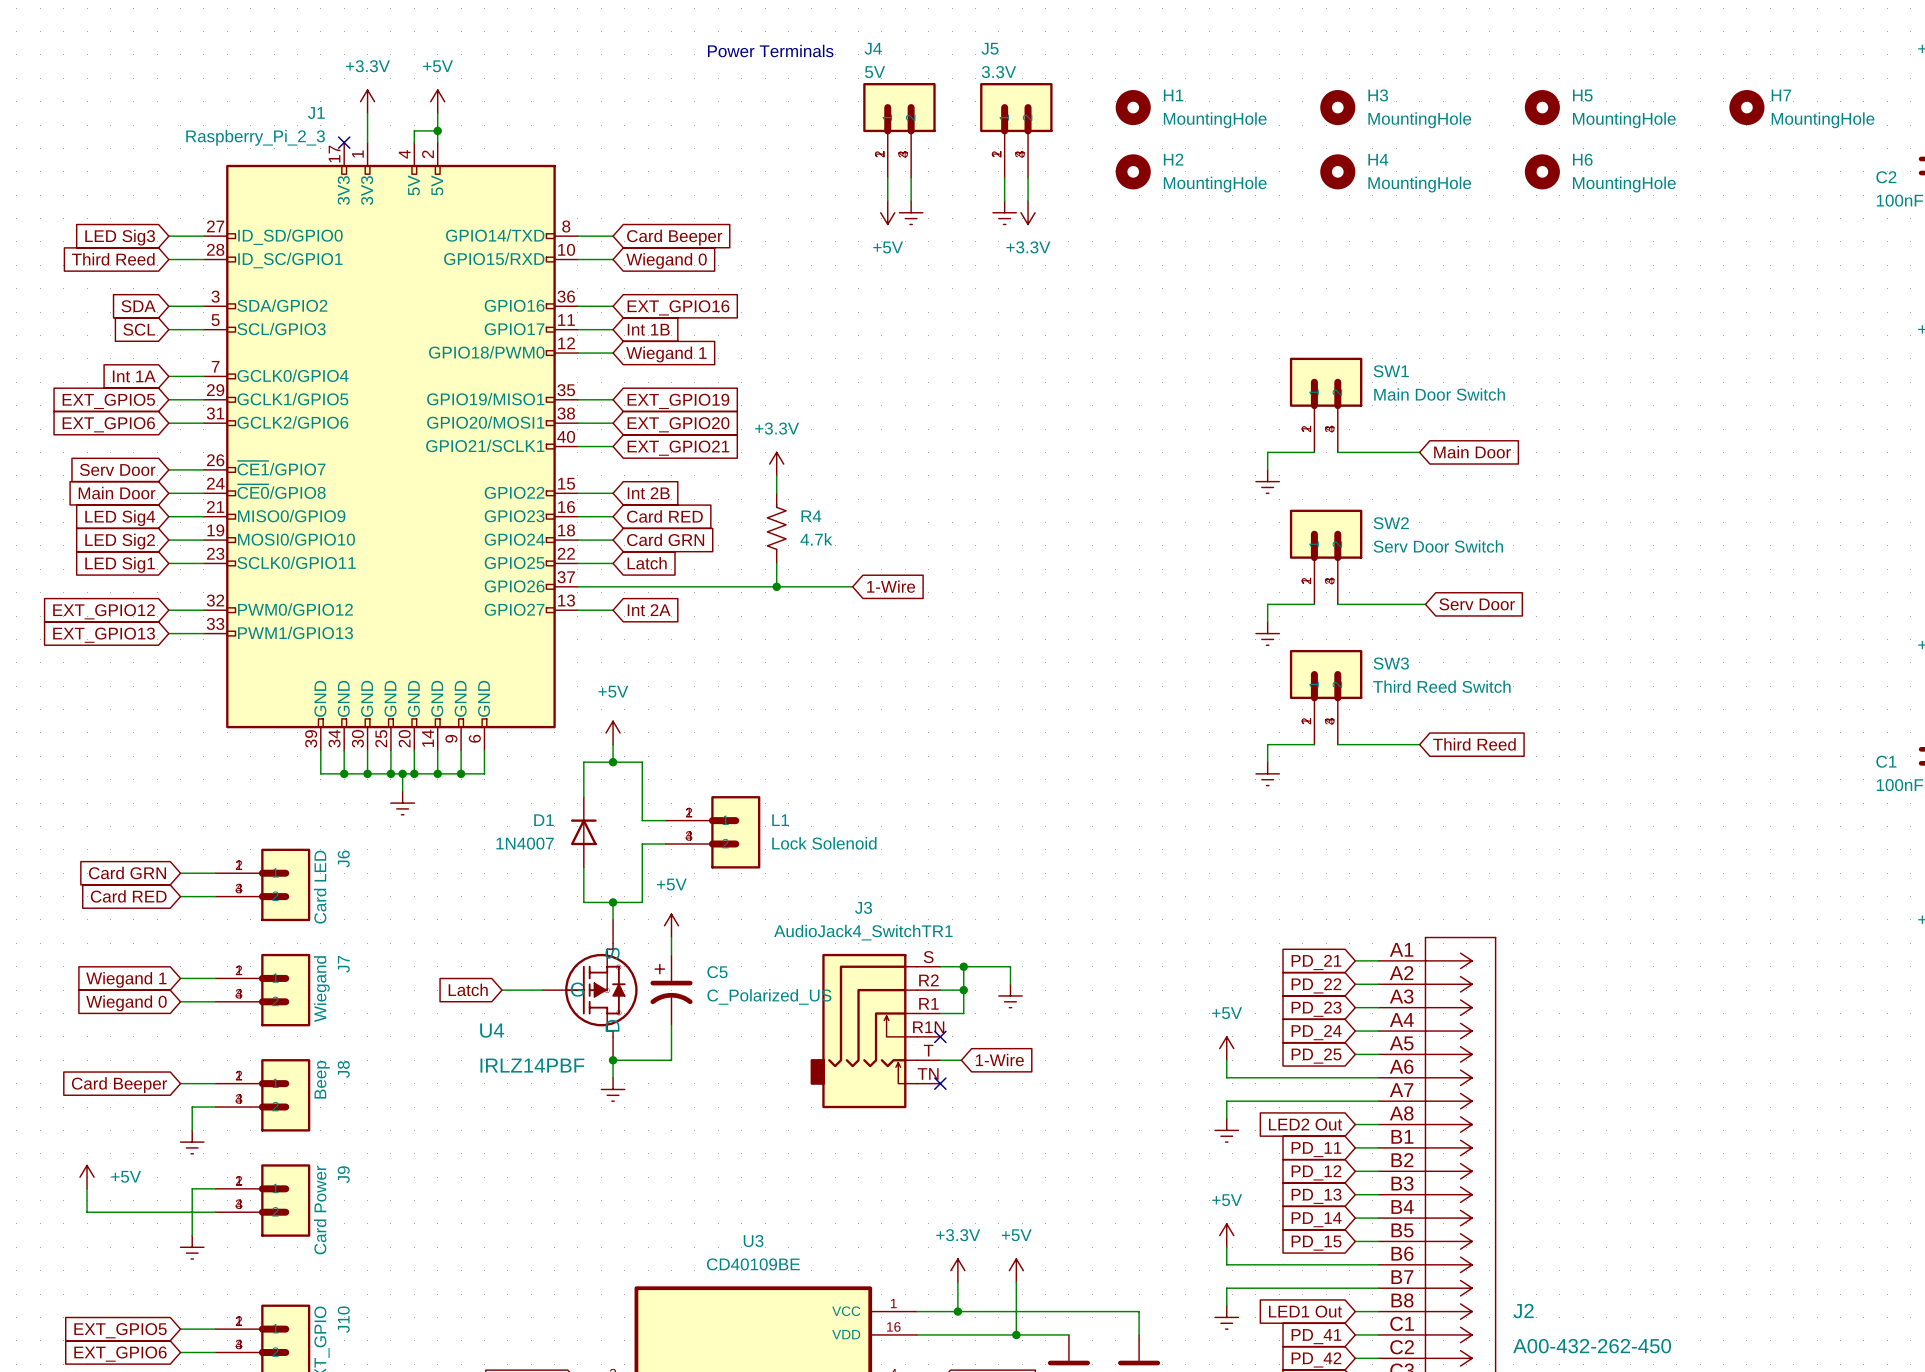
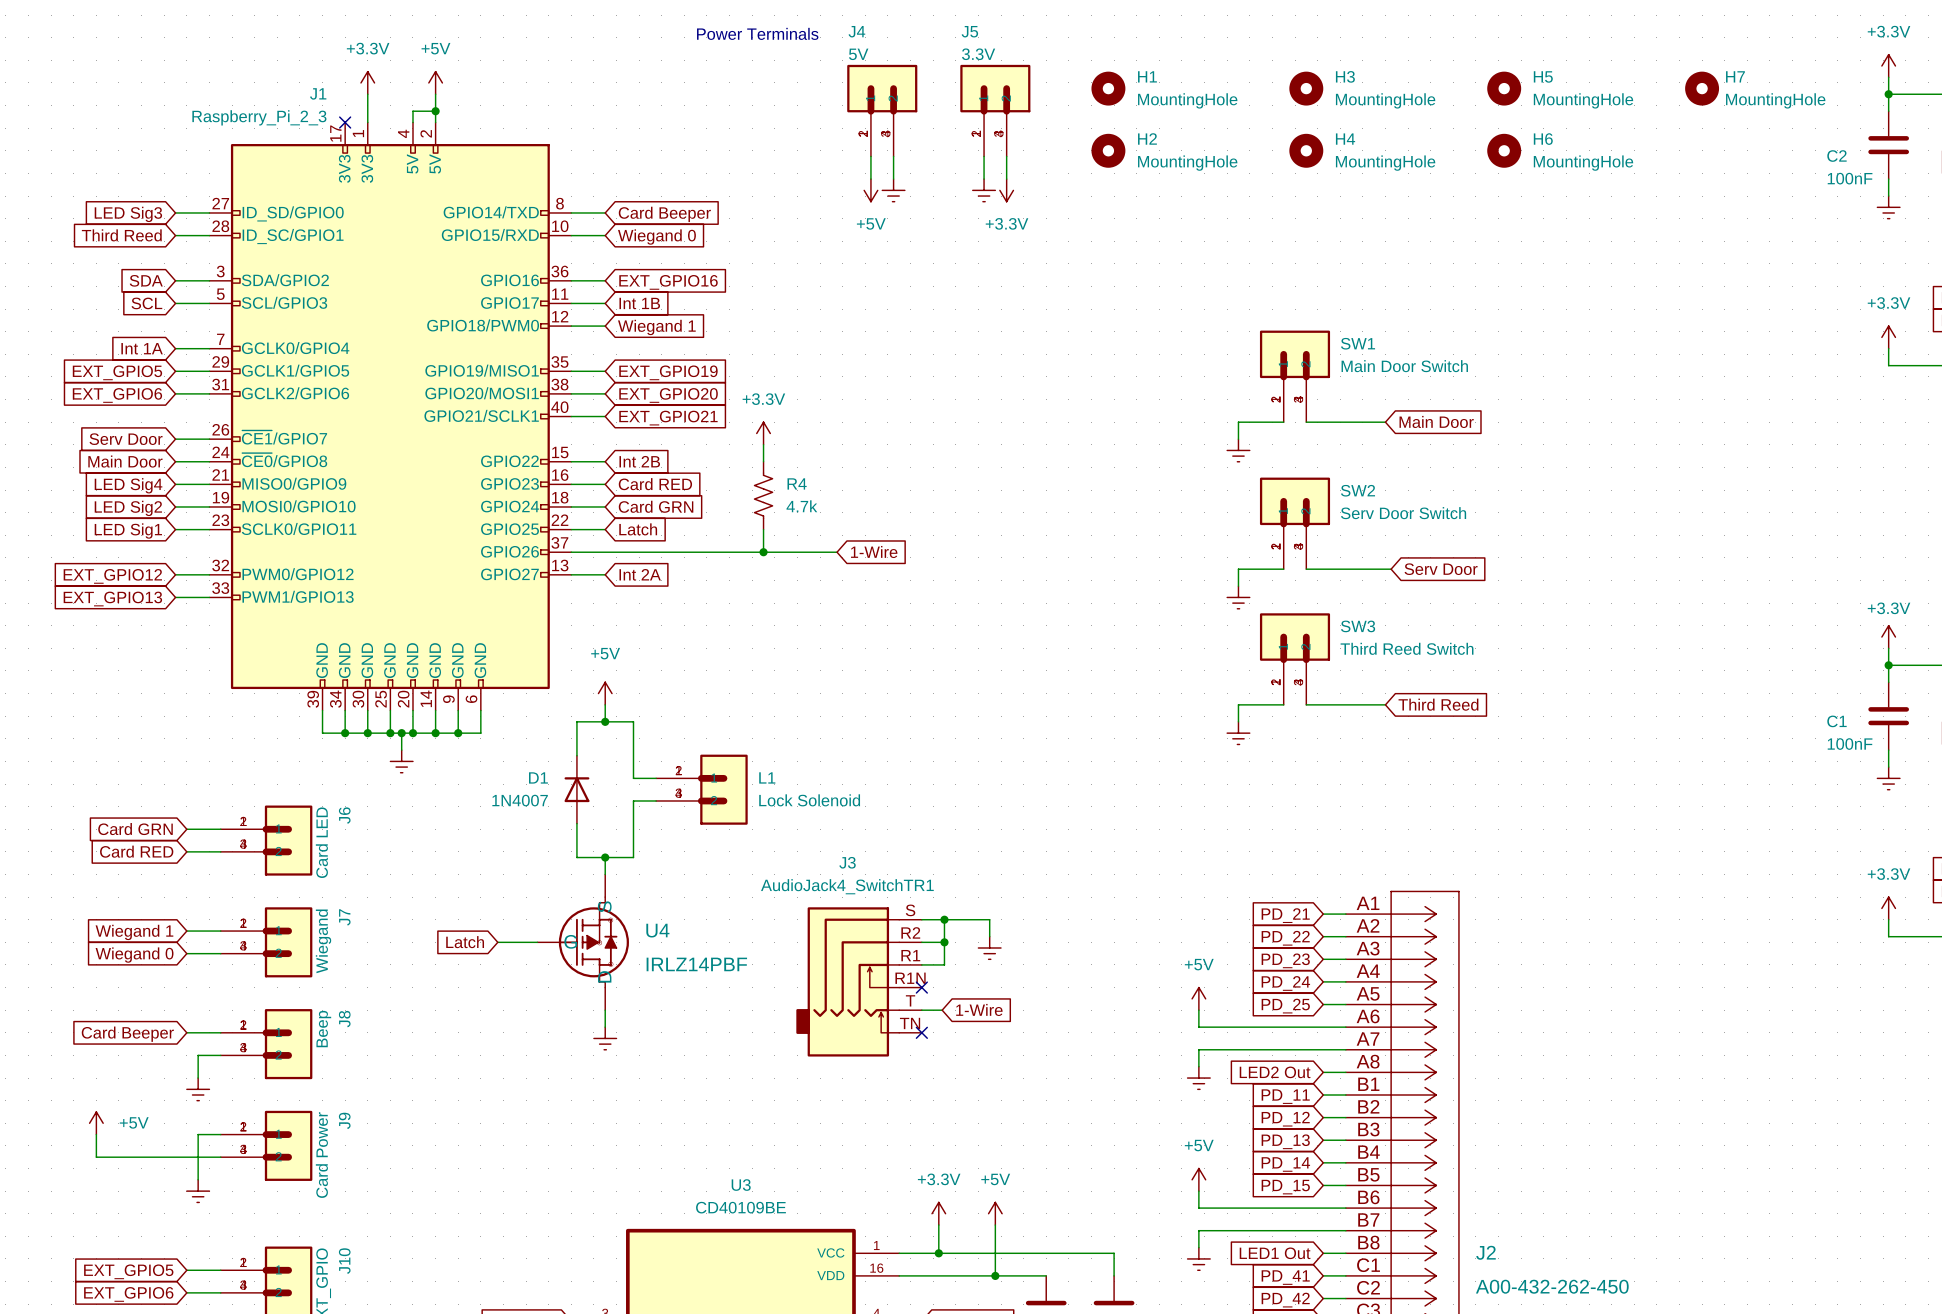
power symbol: +5V (671, 925) -> none
wire: (671, 937) (671, 955) -> none
C5: C_Polarized_US (671, 990) -> none
wire: (671, 1025) (671, 1060) (613, 1060) -> none
U4 name position: U4 (492, 1030) -> U4 (657, 930)
junction: (613, 1060) -> none
U4 value position: IRLZ14PBF (532, 1065) -> IRLZ14PBF (696, 964)

